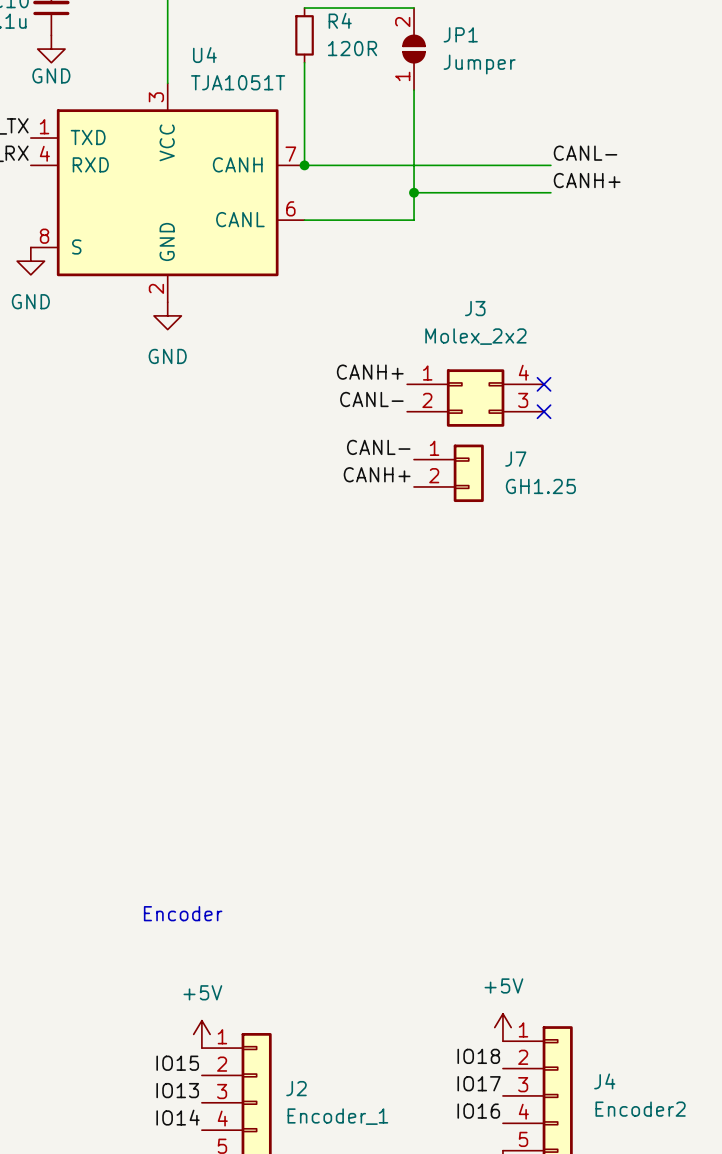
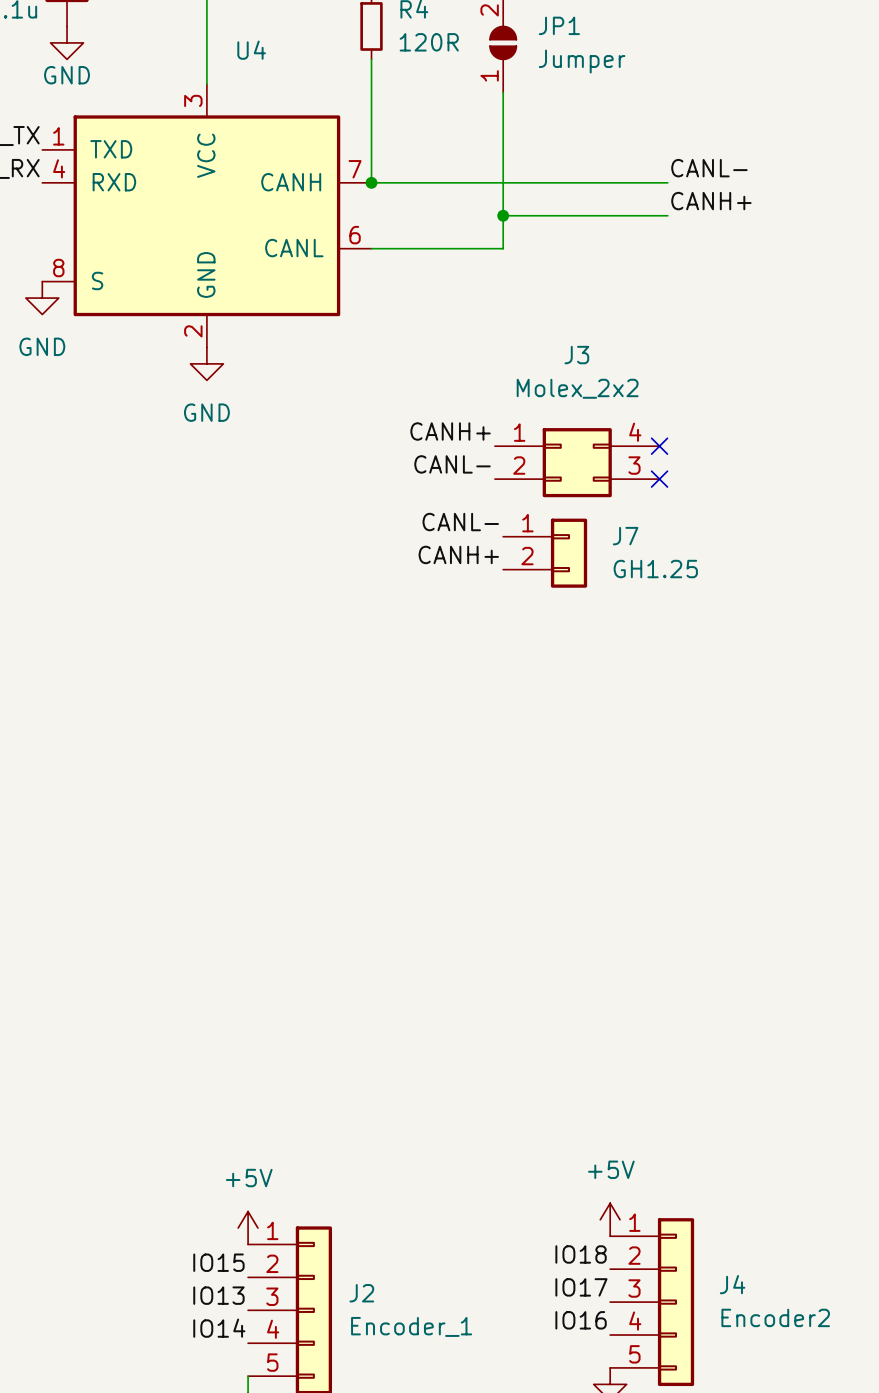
U4 value: TJA1051T (238, 82) -> none
text: Encoder (183, 913) -> none

